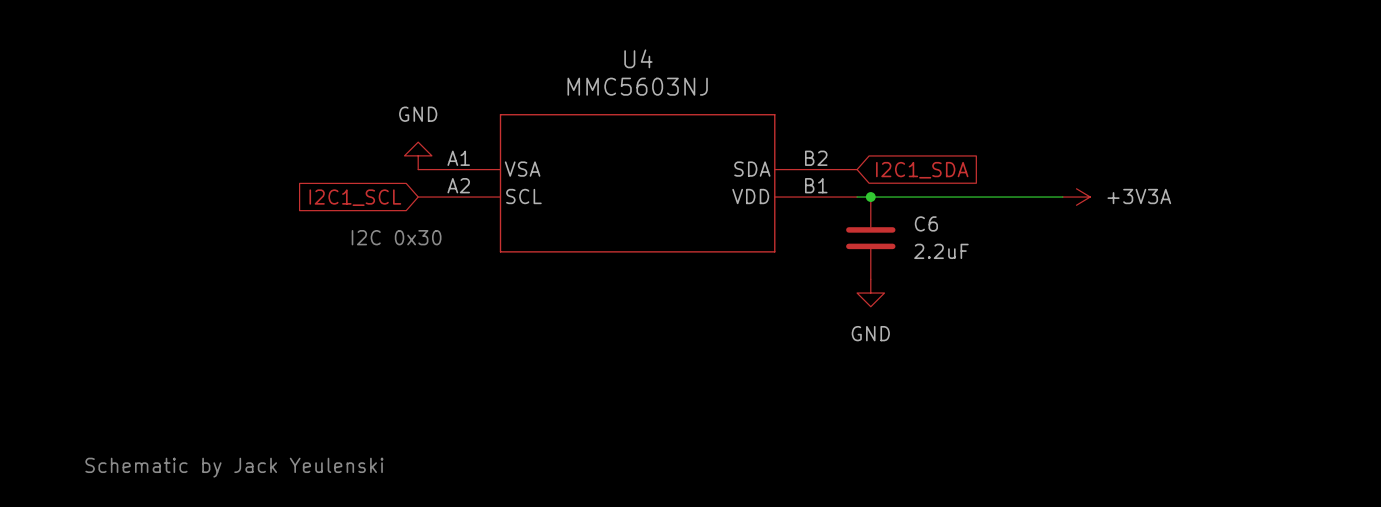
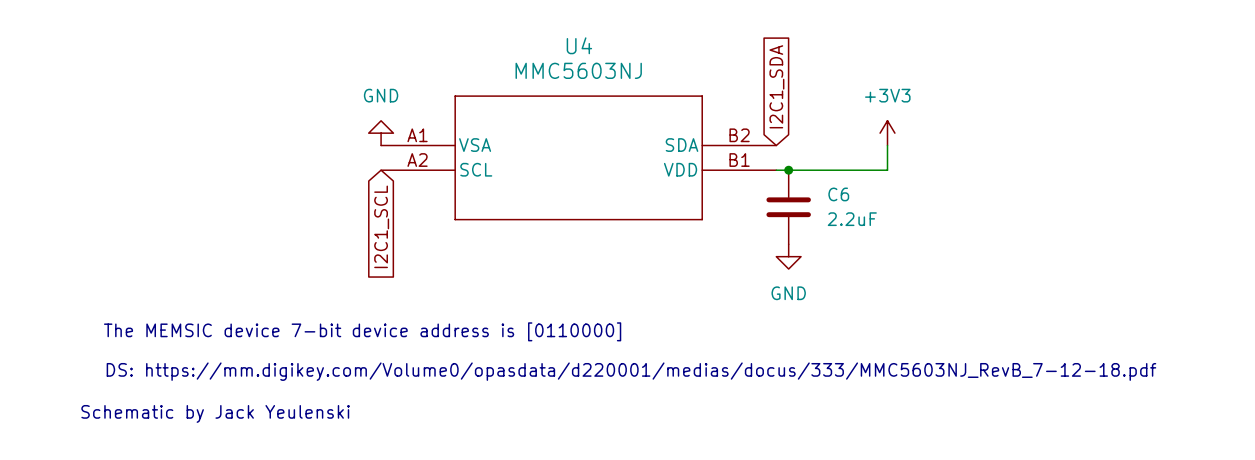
power symbol: none -> +3V3 (887, 133)
global label rotation: 0° (922, 170) -> 90° counterclockwise (776, 86)
global label rotation: 0° (355, 197) -> 90° counterclockwise (381, 226)
wire: (980, 197) (1062, 197) -> (887, 170) (887, 145)
power symbol: +3V3A (1076, 197) -> none
text: I2C 0x30 (396, 237) -> none
text: none -> The MEMSIC device 7-bit device address is [0110000] (362, 331)
text: none -> DS: https://mm.digikey.com/Volume0/opasdata/d220001/medias/docus/333/MMC5603NJ_RevB_7-12-18.pdf (631, 371)

